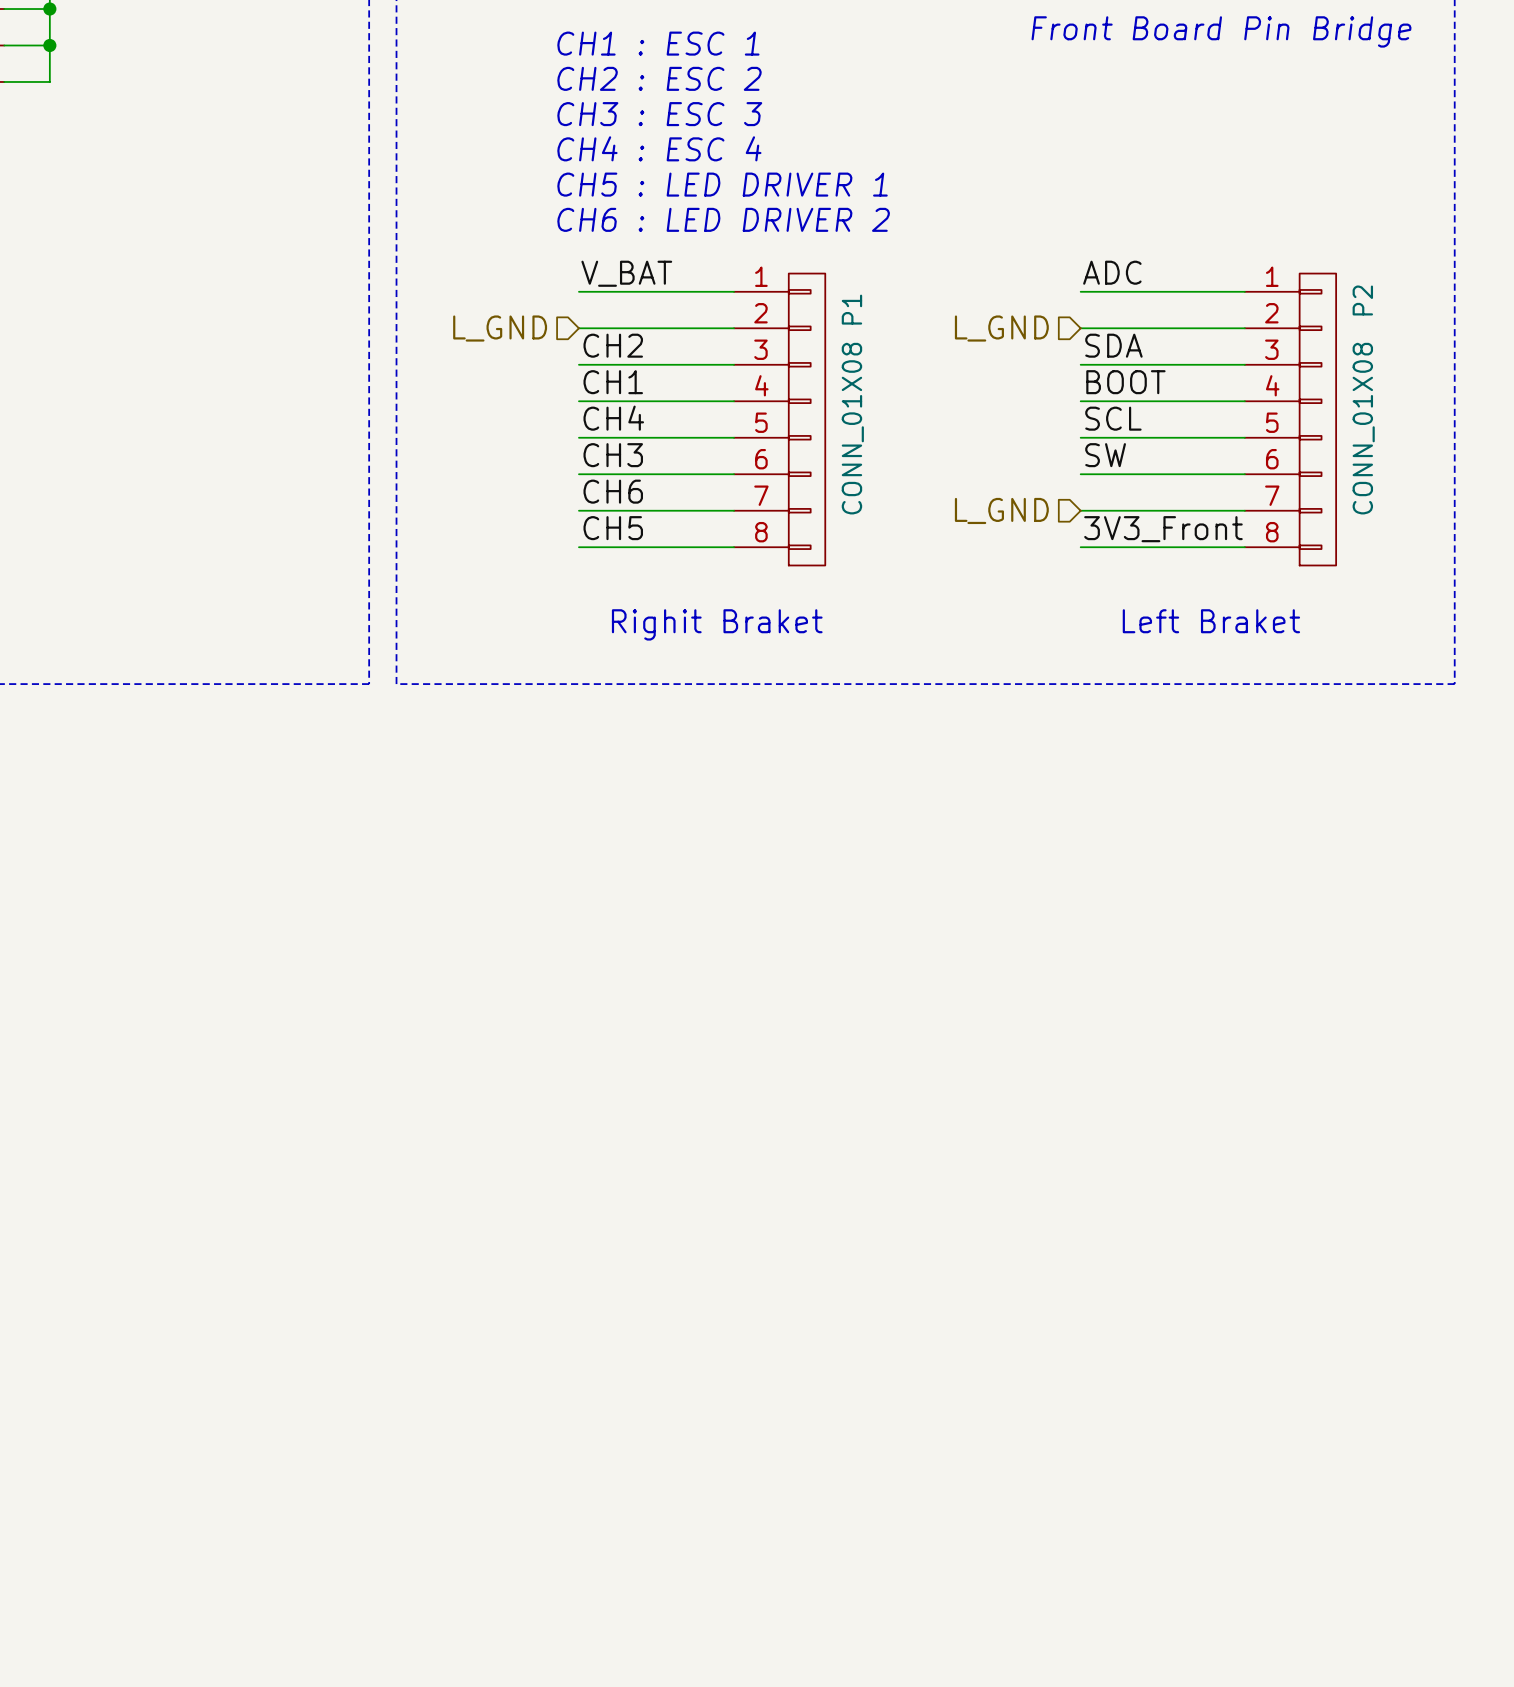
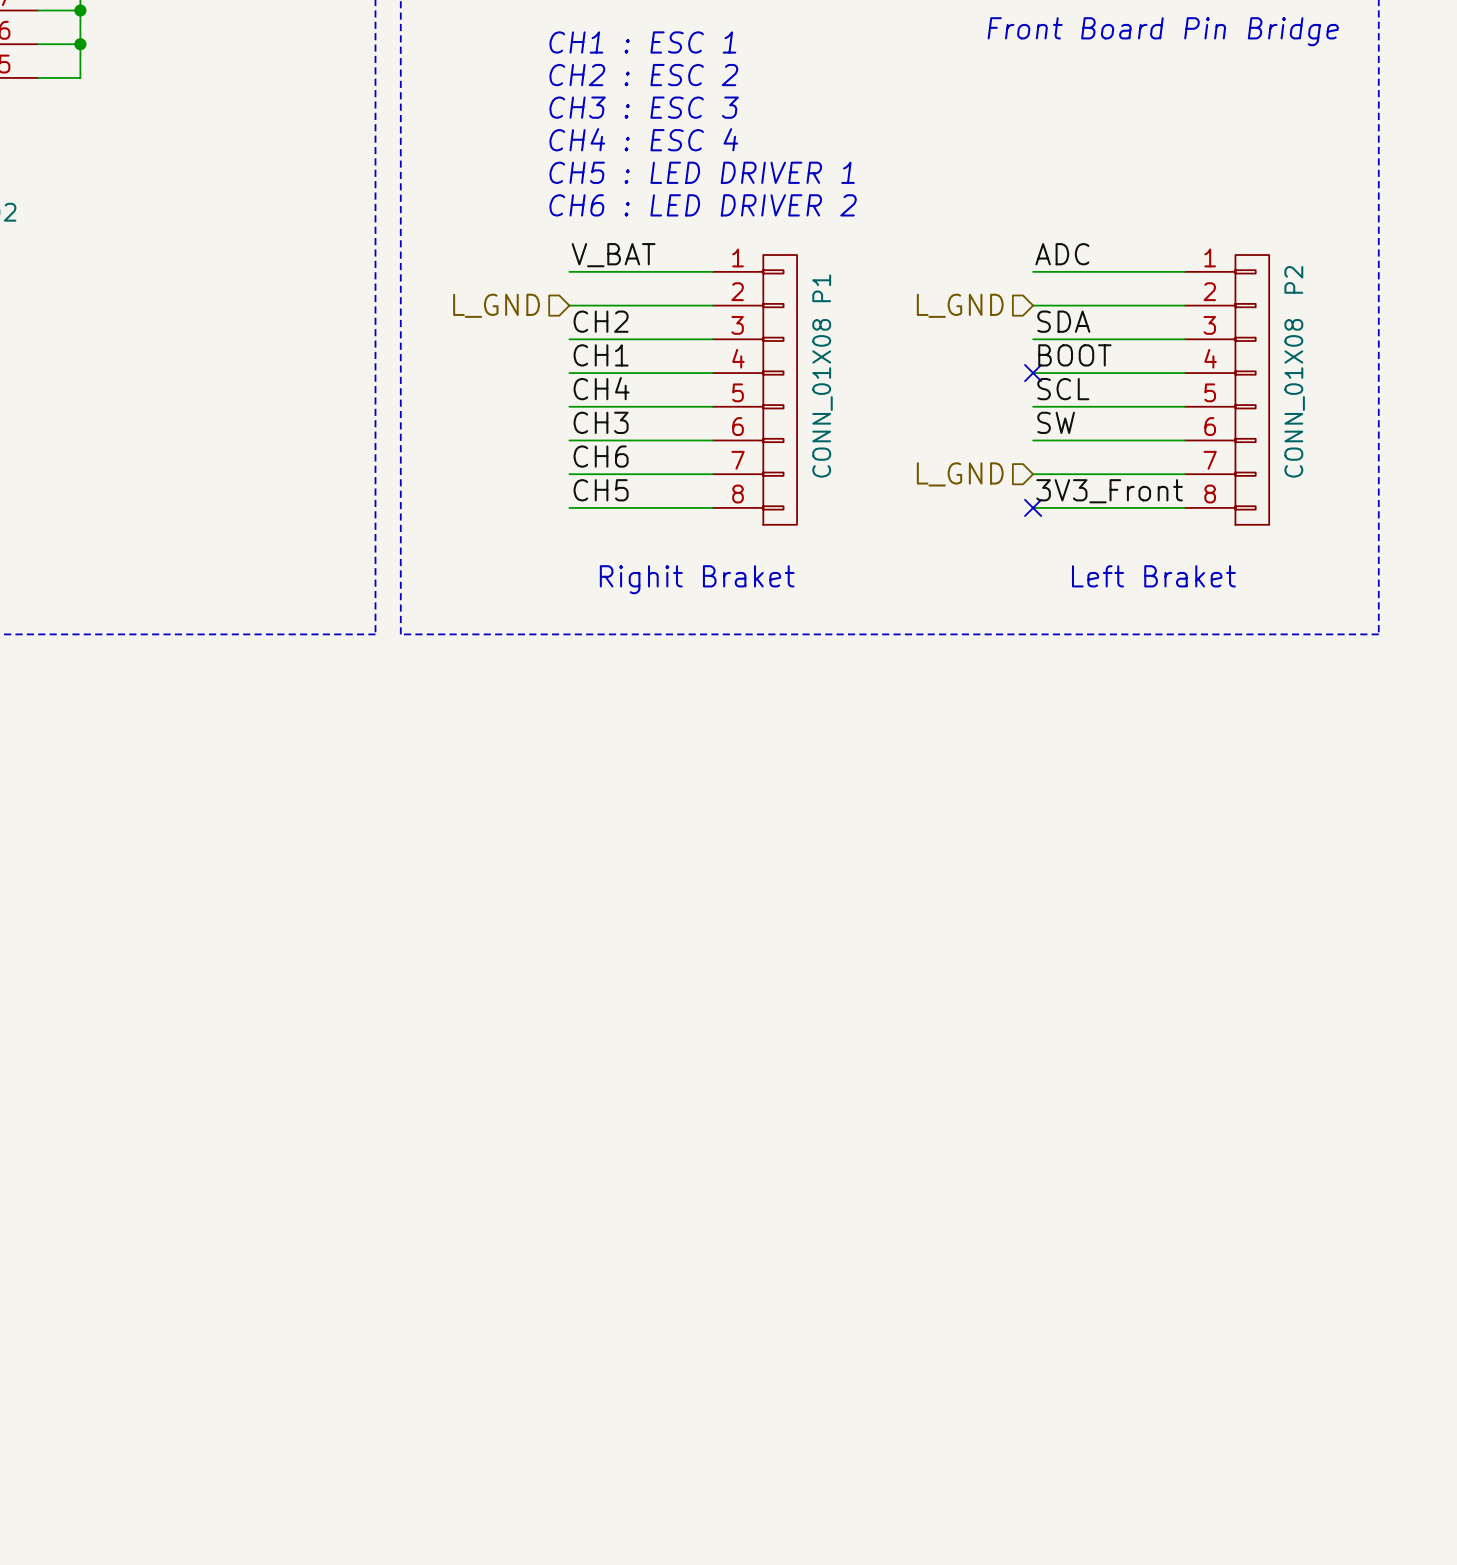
no-connect mark: none -> (1033, 373)
no-connect mark: none -> (1033, 507)

